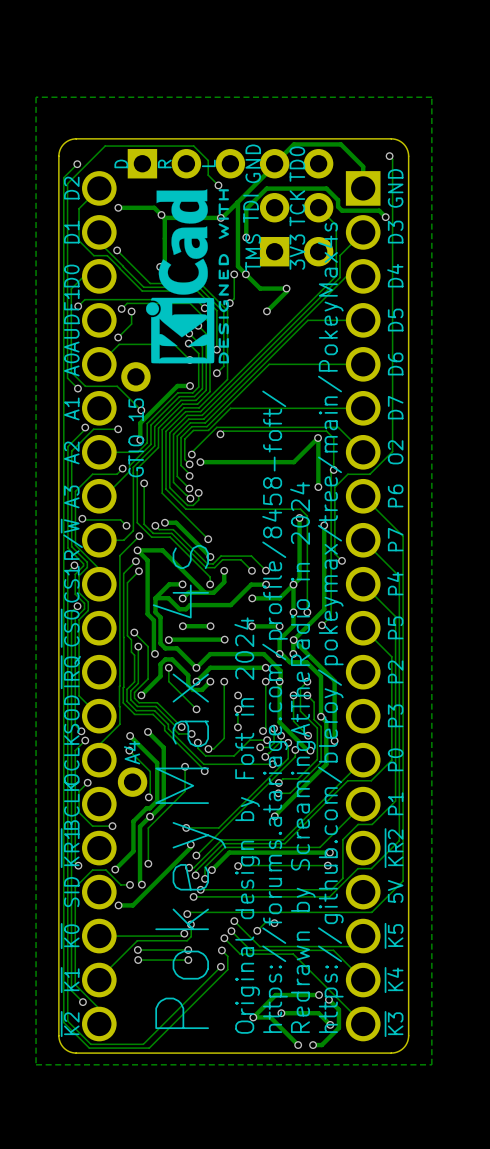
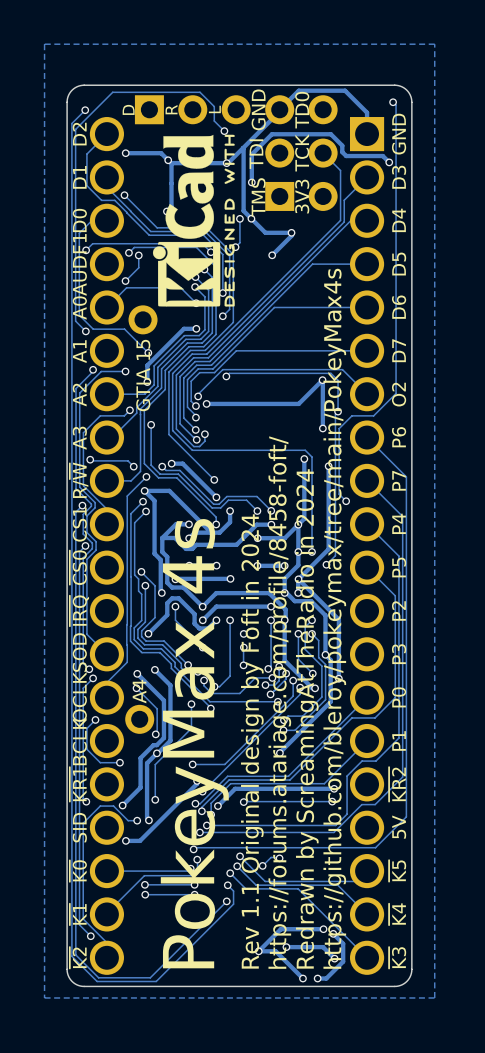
text: GTIO 15 (136, 437) -> GTIA 15 (143, 375)
text: Original design by Foft in 2024 (247, 825) -> Rev 1.1 Original design by Foft in 2024 (252, 741)

